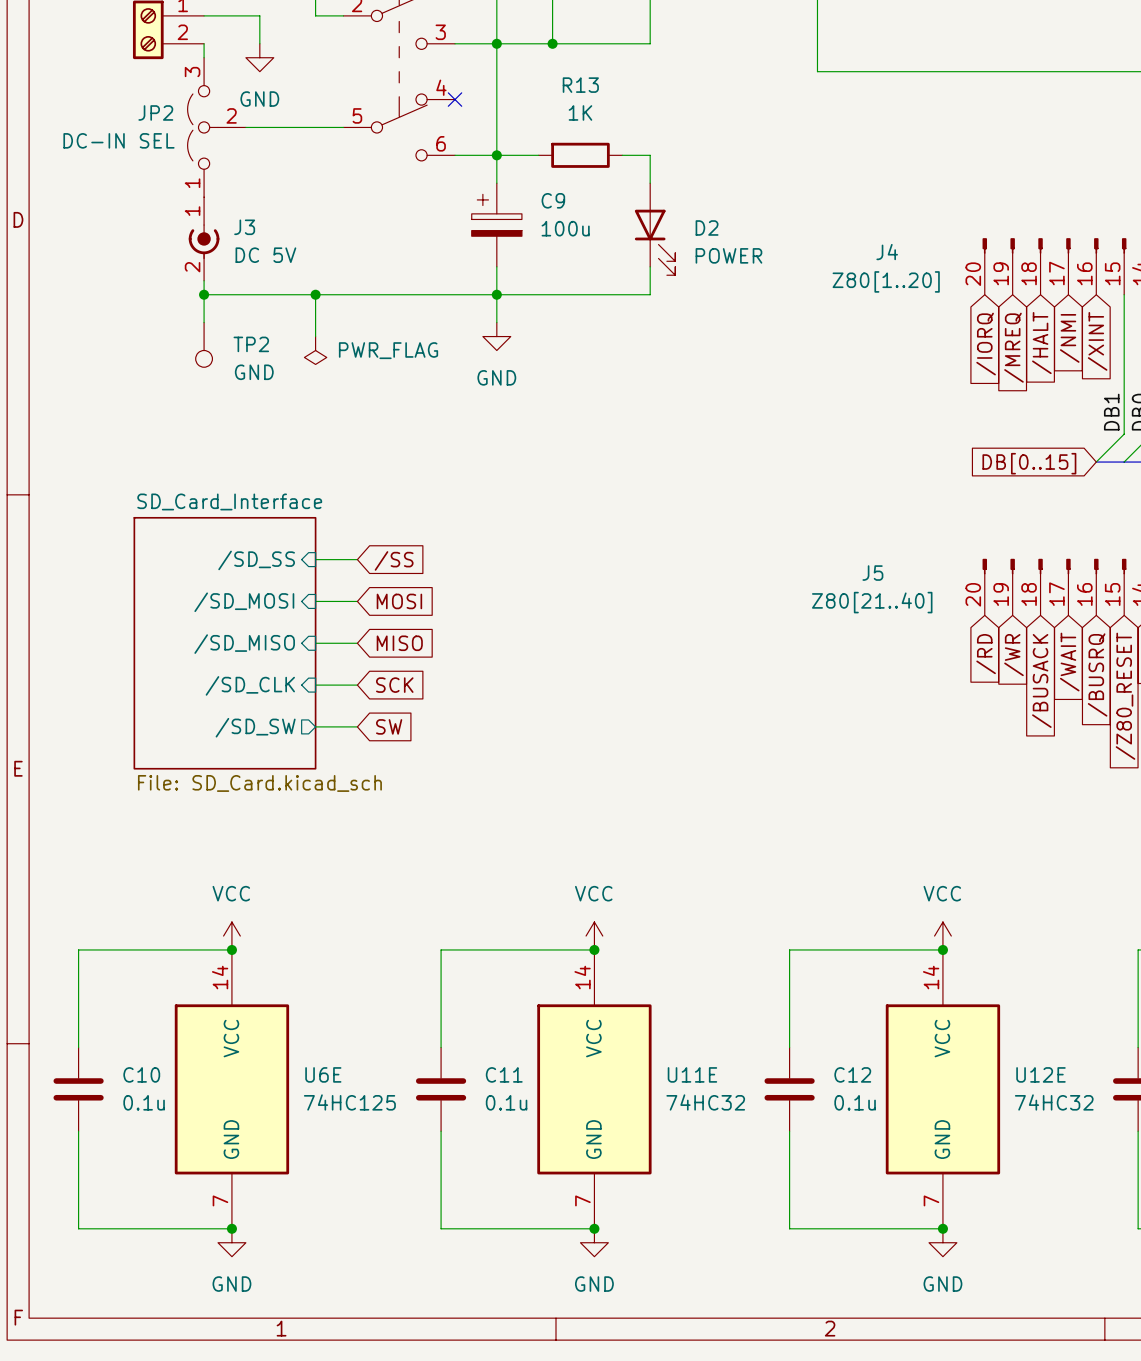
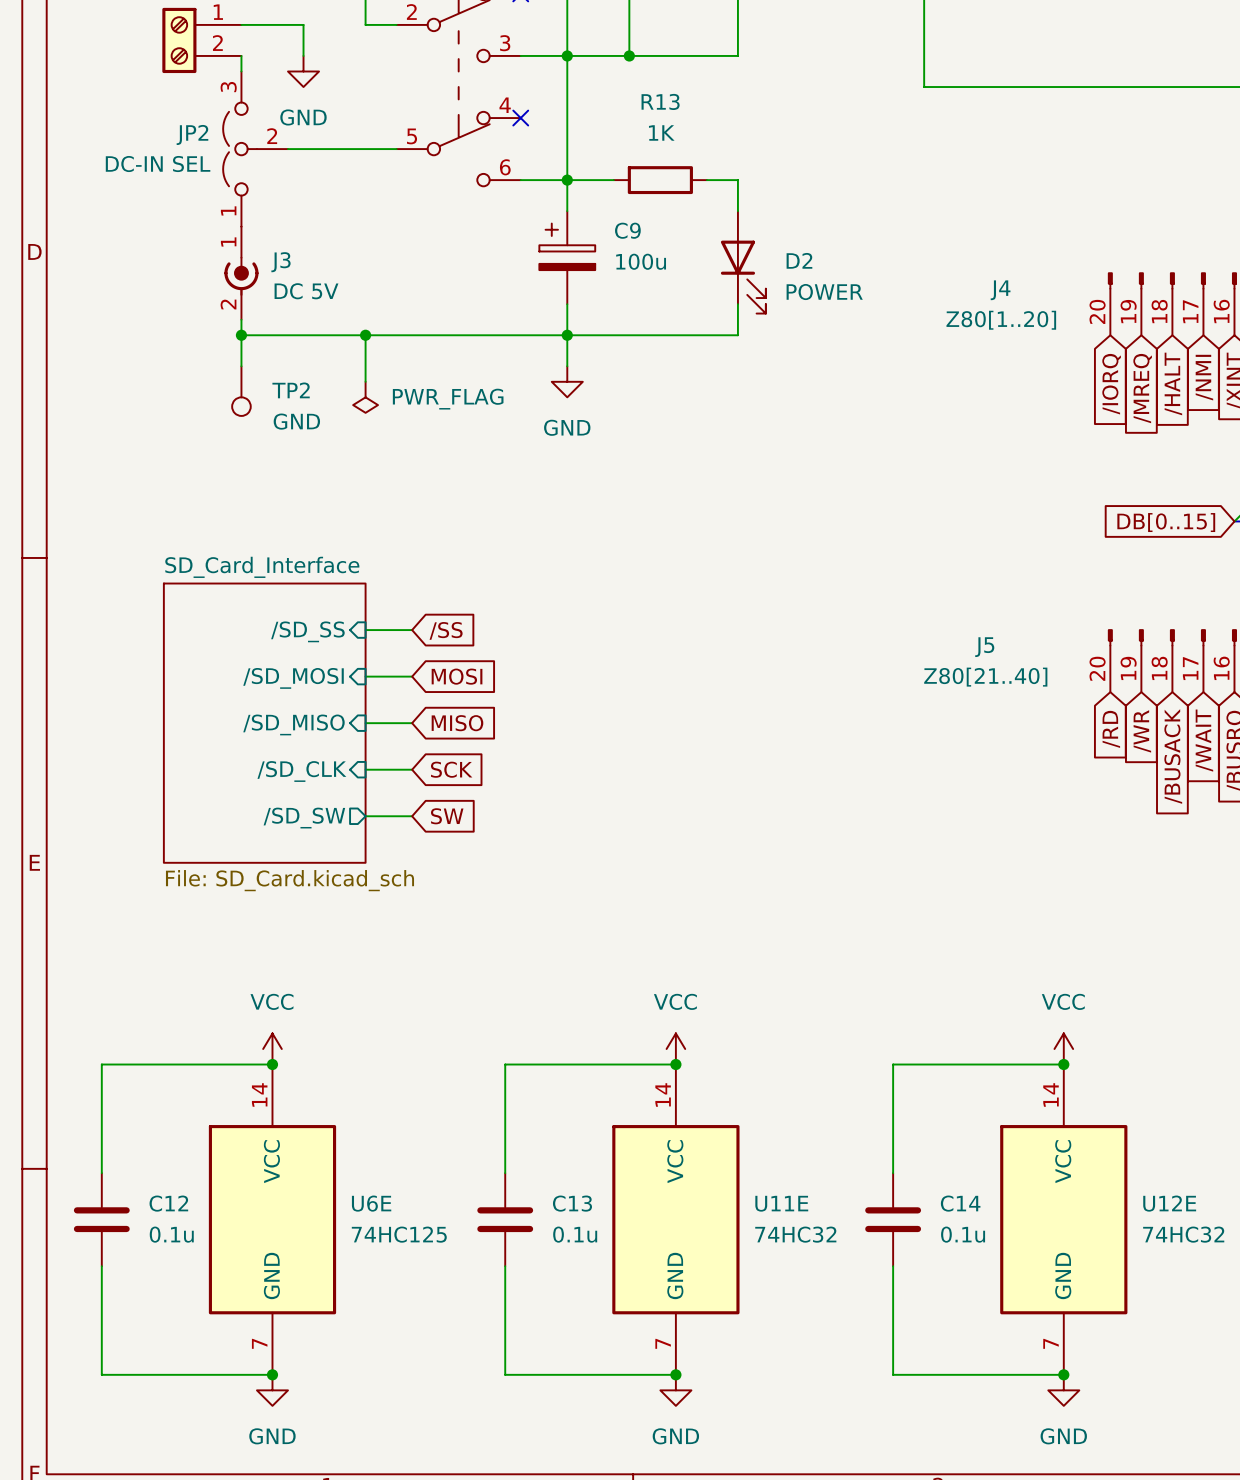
C10 name: C10 (141, 1074) -> C12 (168, 1203)
C11 name: C11 (504, 1074) -> C13 (572, 1203)
C12 name: C12 (852, 1074) -> C14 (960, 1203)

